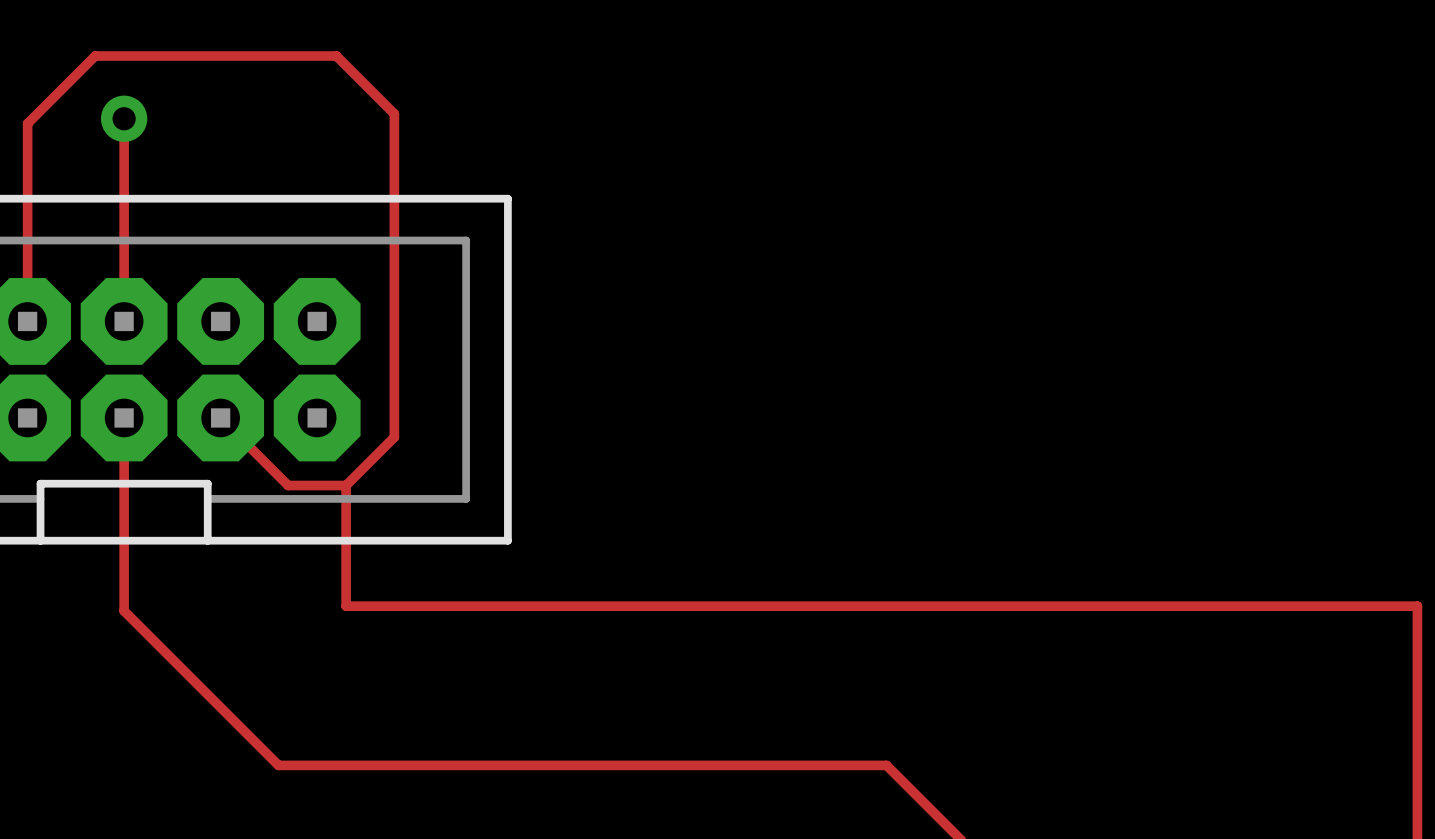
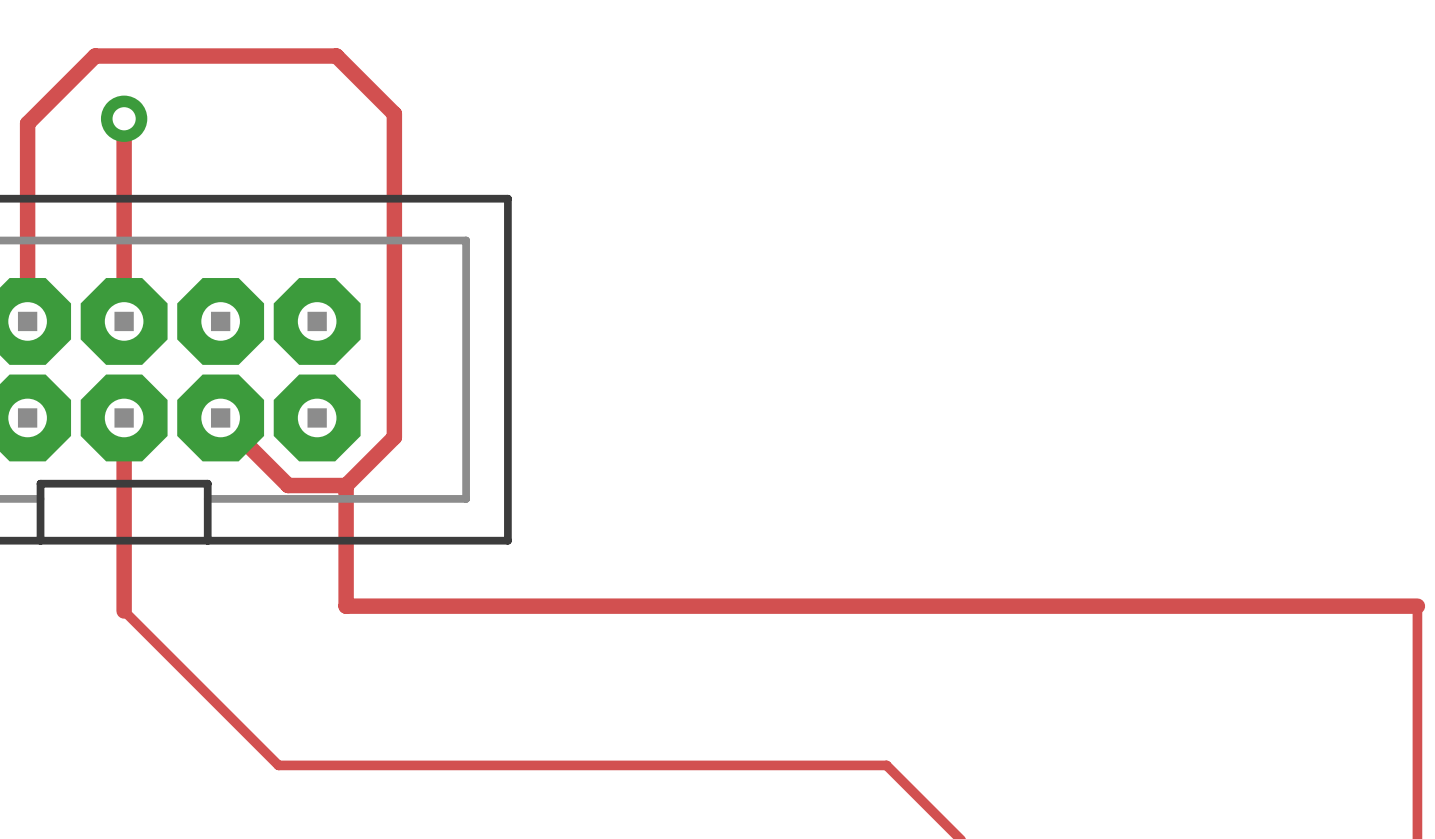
track width: thin (124, 118) (124, 321) -> thick (124, 118) (124, 321)
track width: thin (27, 321) (27, 123) (95, 56) (336, 56) (394, 113) (394, 437) (346, 485) -> thick (27, 321) (27, 123) (95, 56) (336, 56) (394, 113) (394, 437) (346, 485)
track width: thin (124, 417) (124, 610) -> thick (124, 417) (124, 610)
track width: thin (220, 417) (288, 485) (346, 485) -> thick (220, 417) (288, 485) (346, 485)
track width: thin (346, 485) (346, 606) (1417, 606) -> thick (346, 485) (346, 606) (1417, 606)

